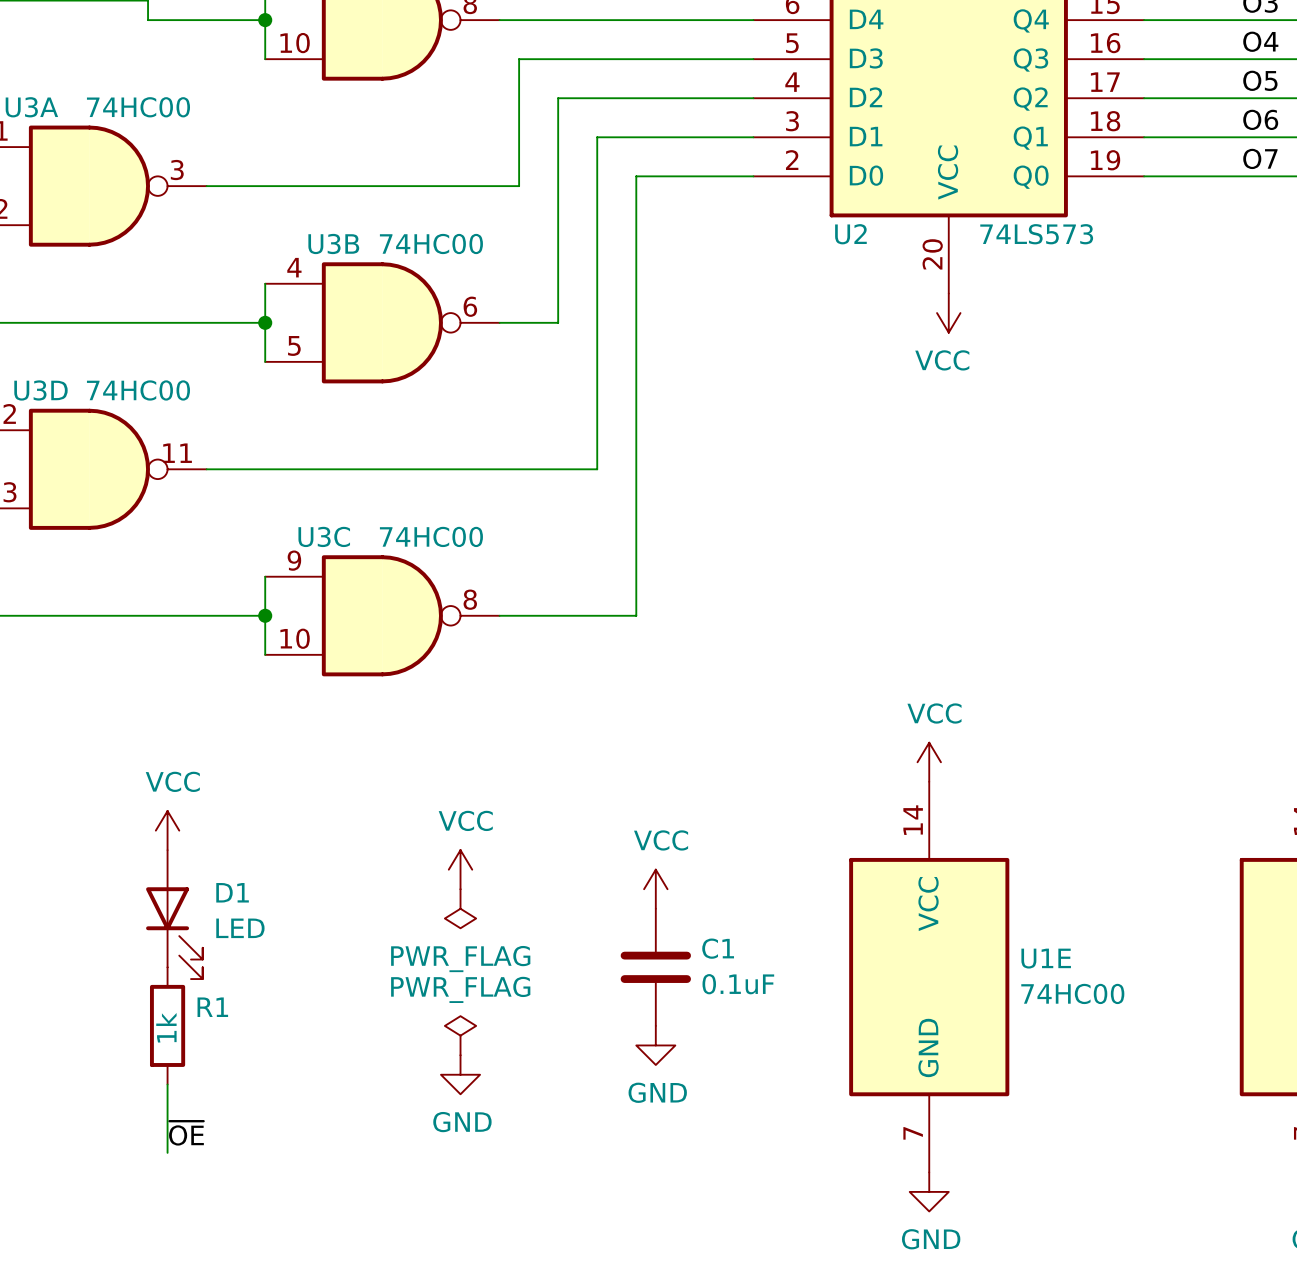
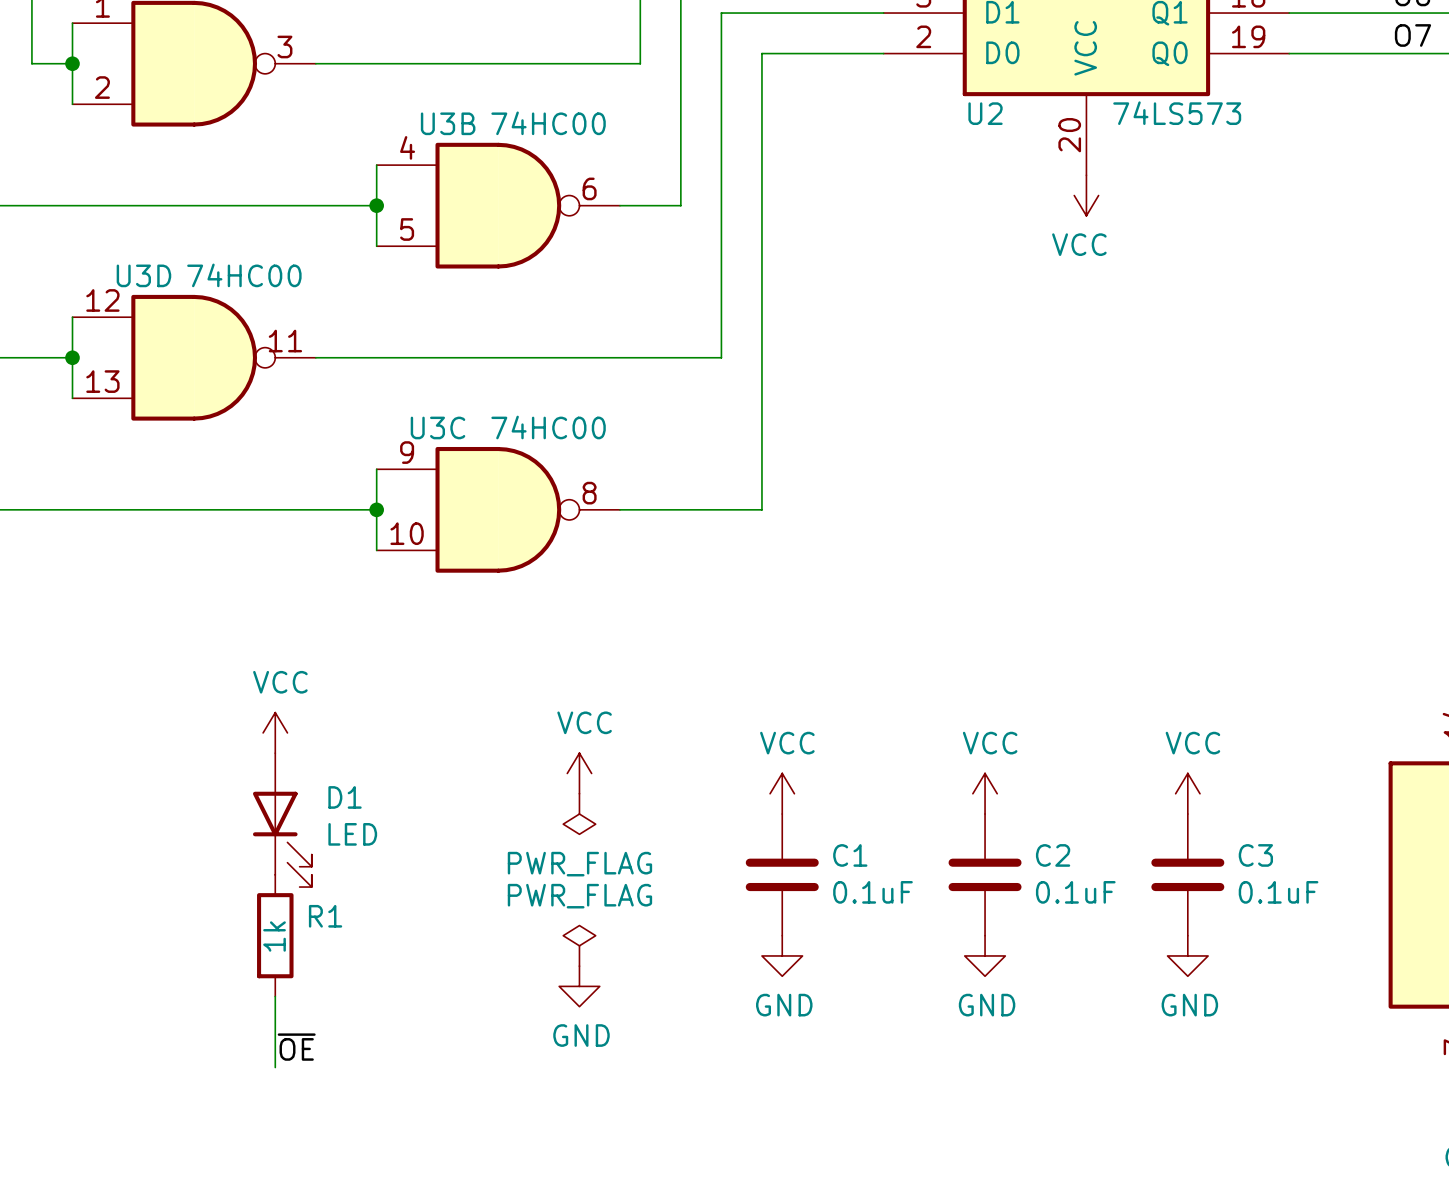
power symbol: VCC (929, 762) -> none
power symbol: none -> VCC (985, 793)
power symbol: none -> VCC (1187, 793)
C2: none -> 0.1uF (985, 874)
C3: none -> 0.1uF (1187, 874)
U1E: 74HC00 (929, 977) -> none
power symbol: none -> GND (985, 955)
power symbol: none -> GND (1187, 955)
power symbol: GND (929, 1191) -> none

